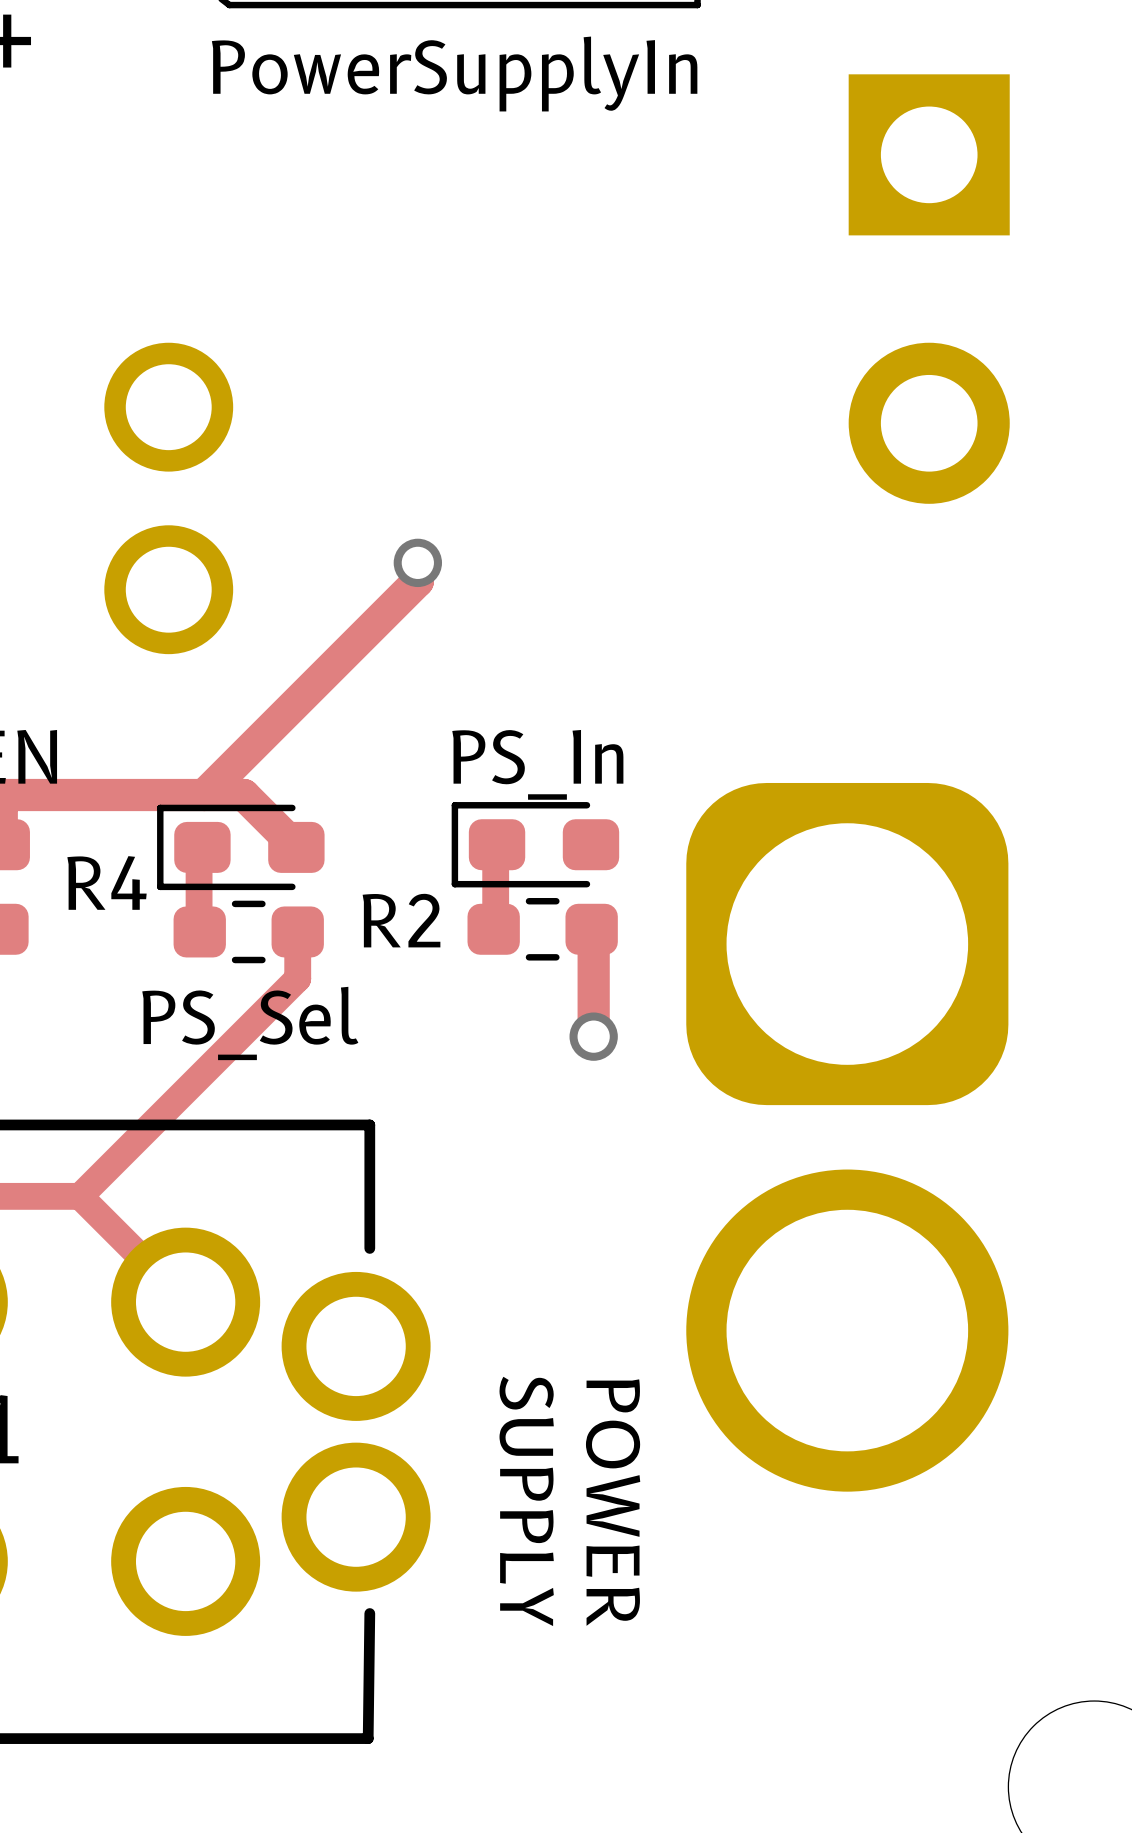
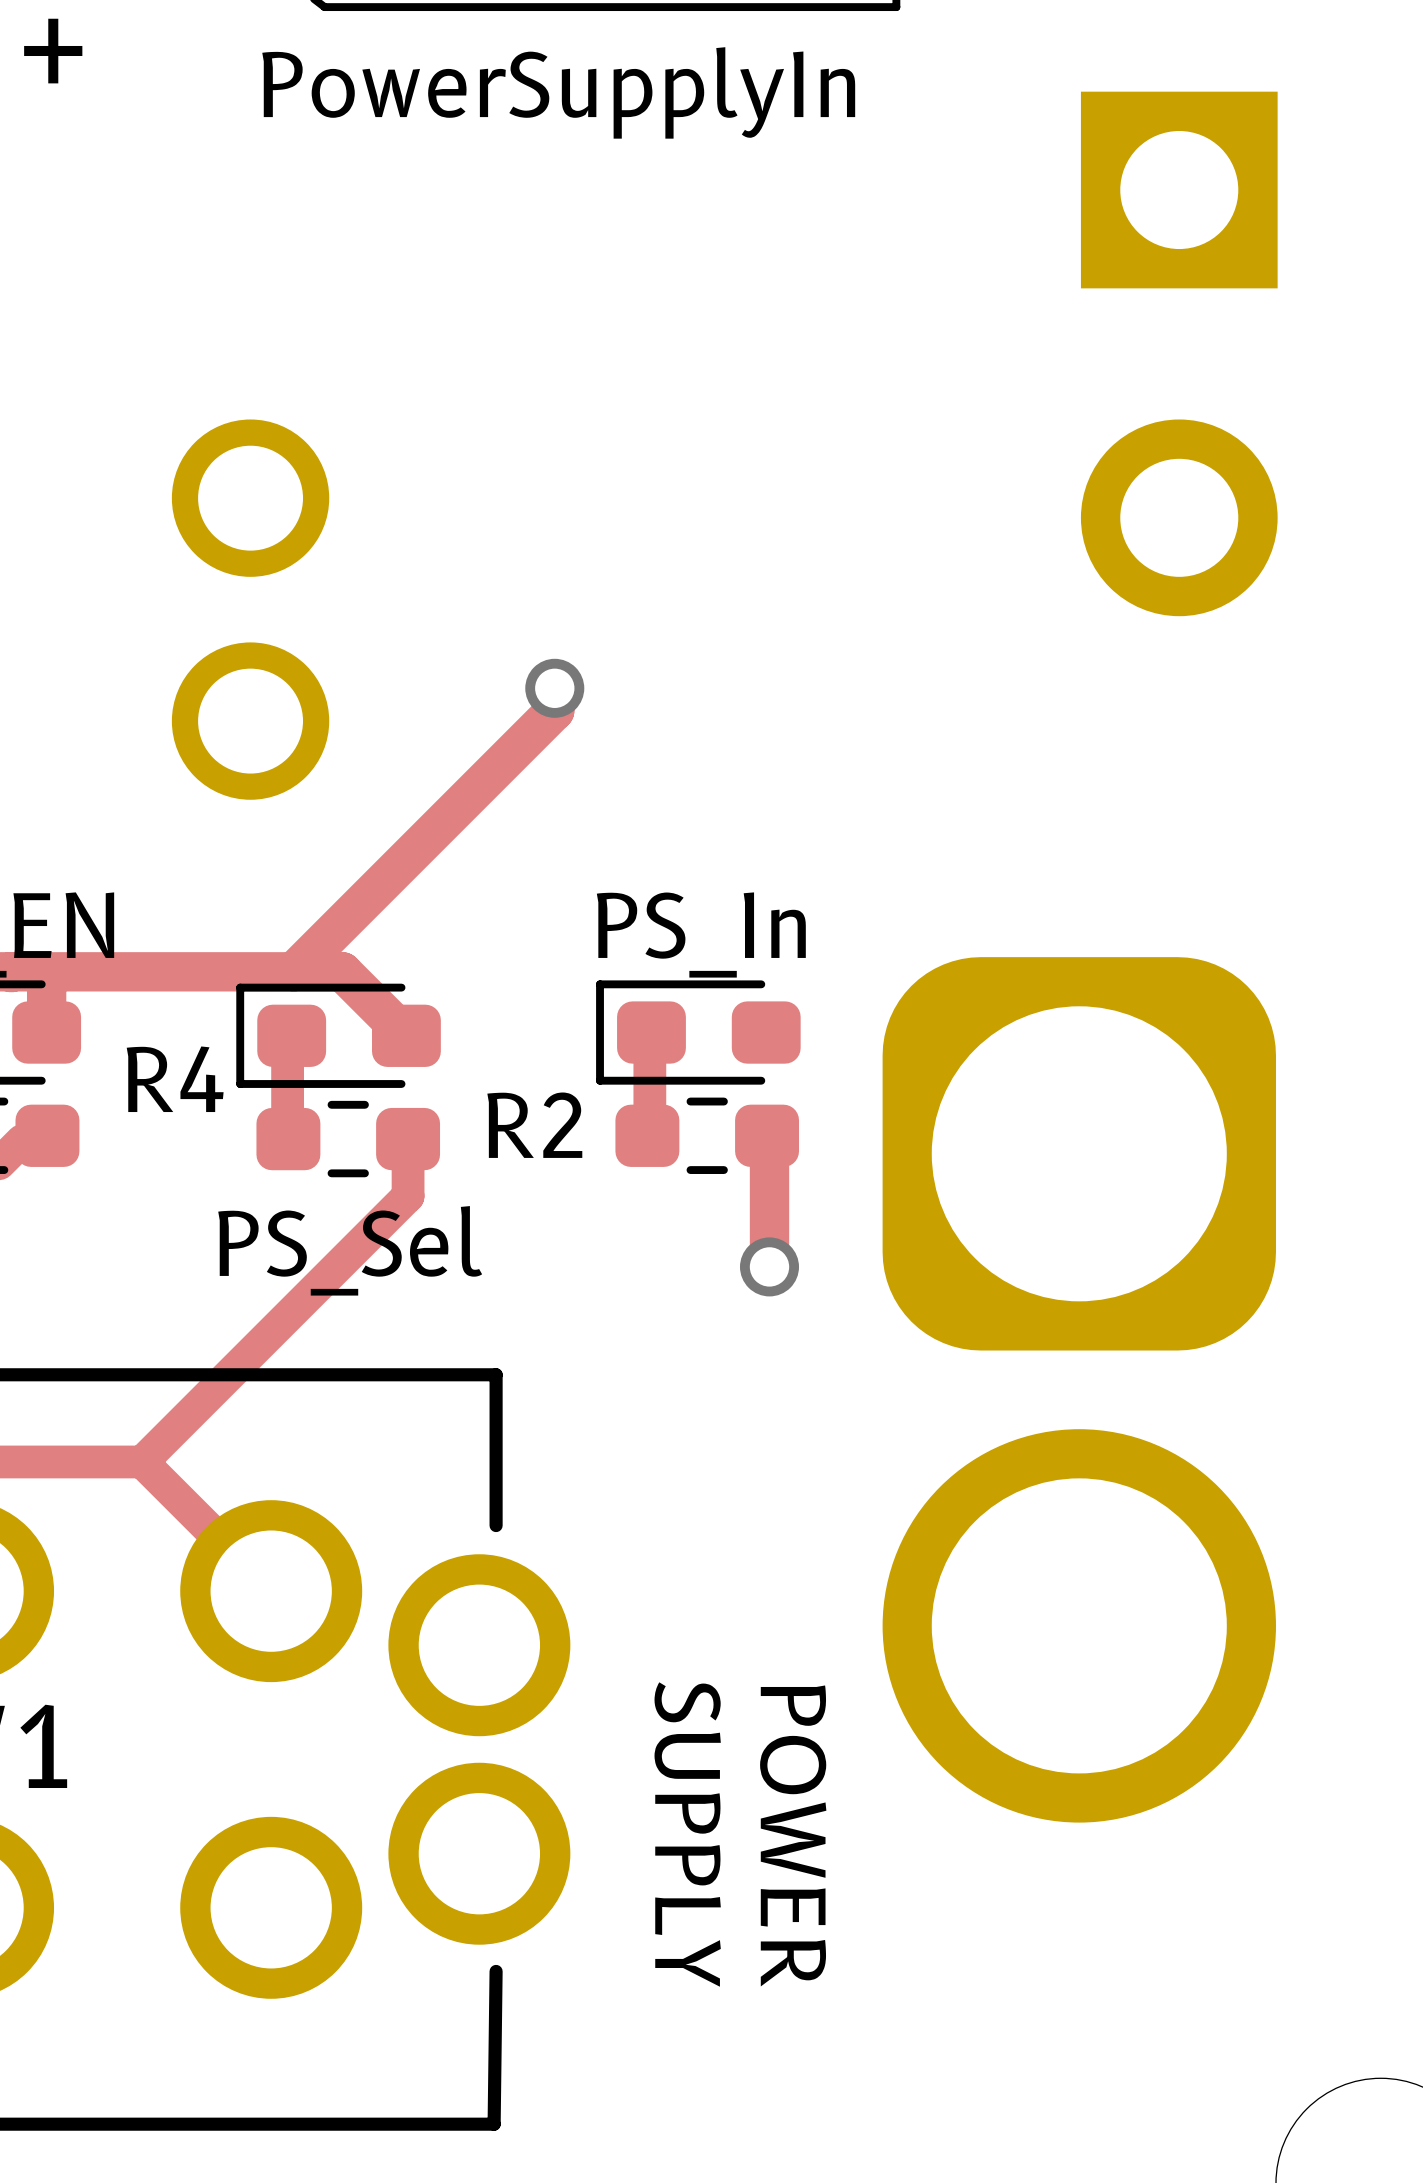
part value position: PowerSupplyIn (454, 74) -> PowerSupplyIn (558, 92)

